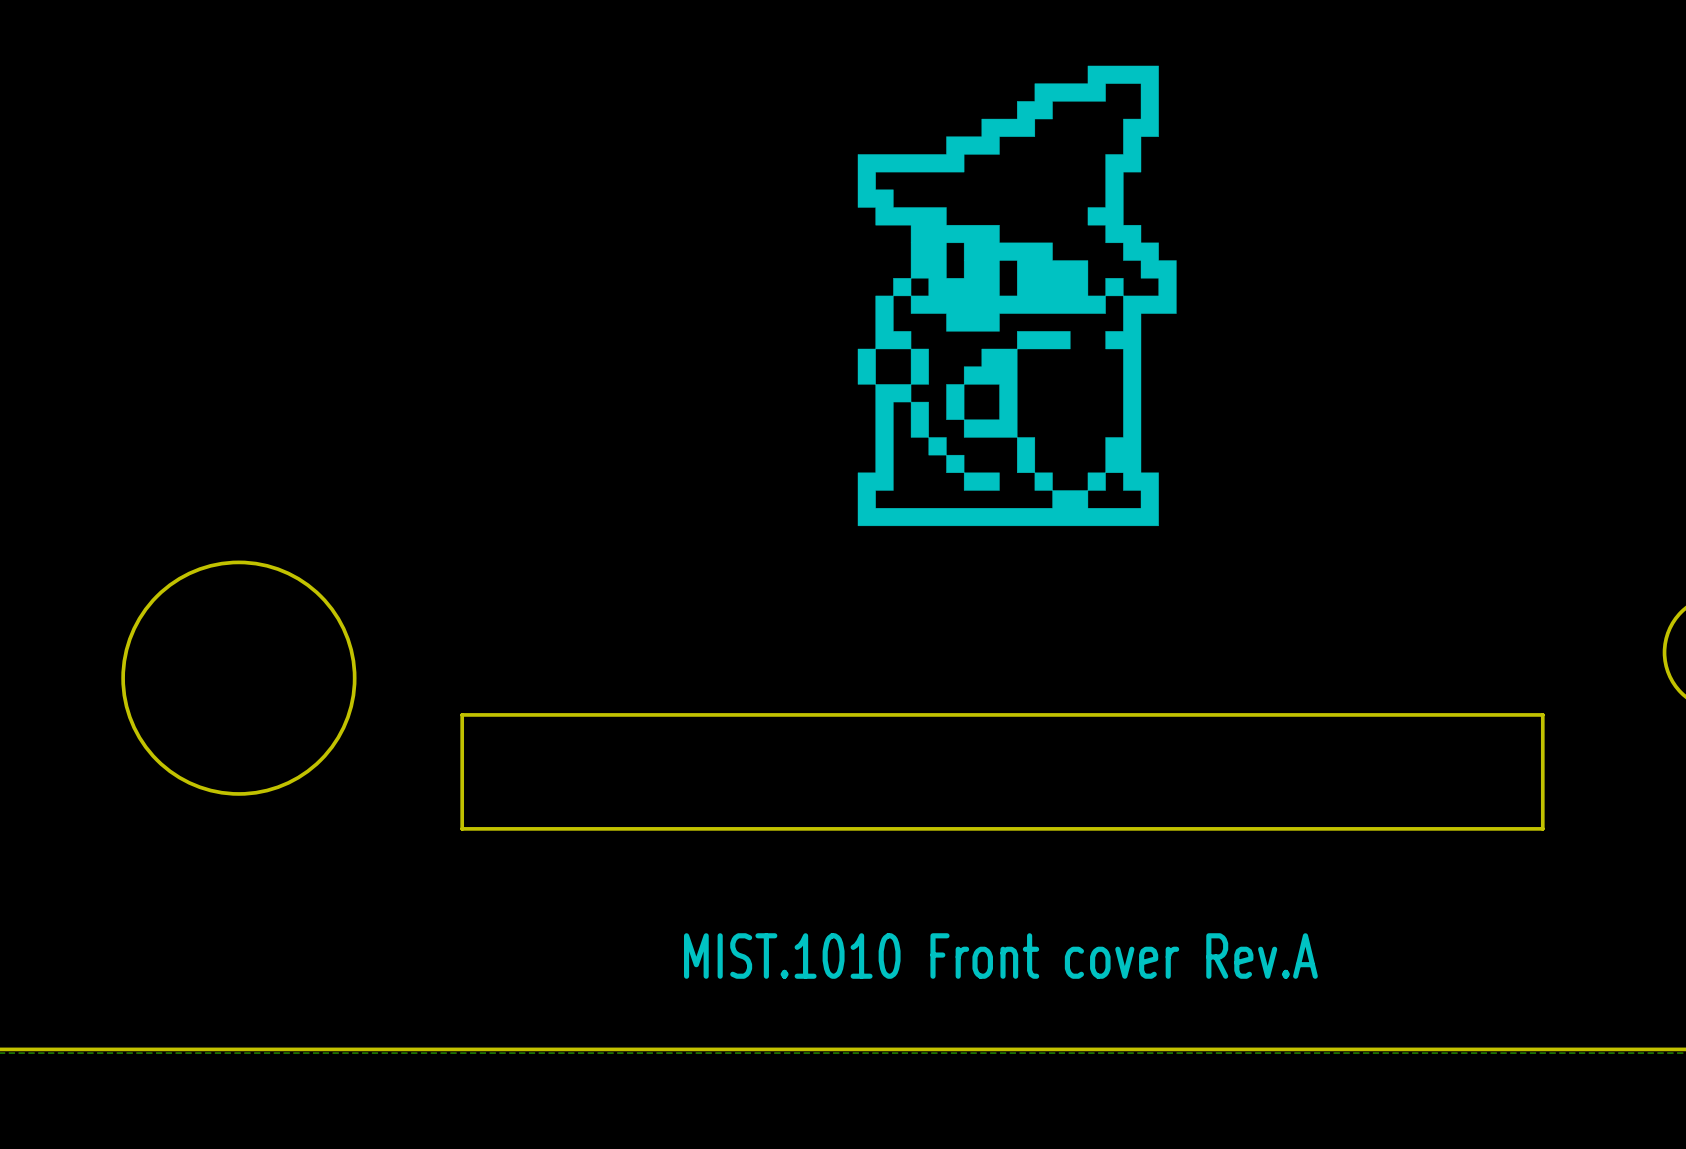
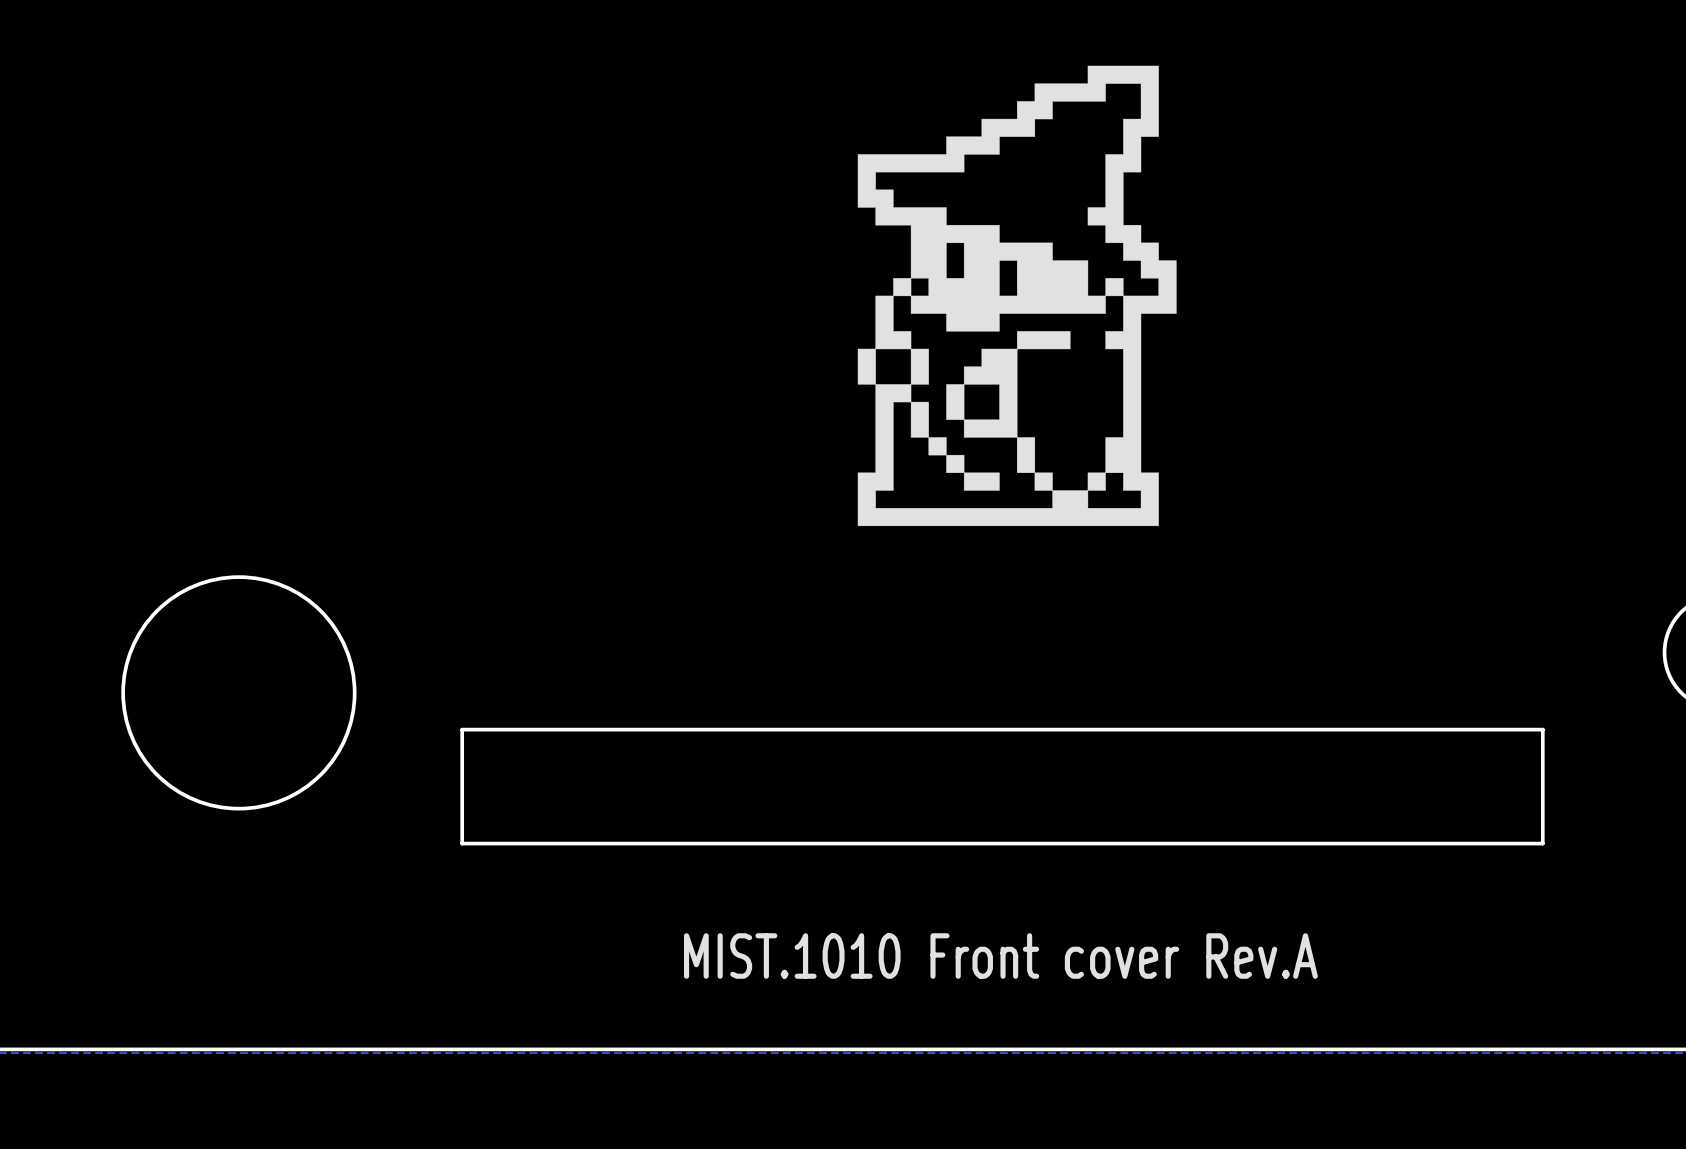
round board edge position: (238, 678) -> (238, 692)
board edge: (1542, 729) (1542, 714) (462, 714) (462, 729) -> (1542, 729) (462, 729)
board edge: (1542, 828) (462, 828) -> (1542, 828) (1542, 843) (462, 843) (462, 828)

